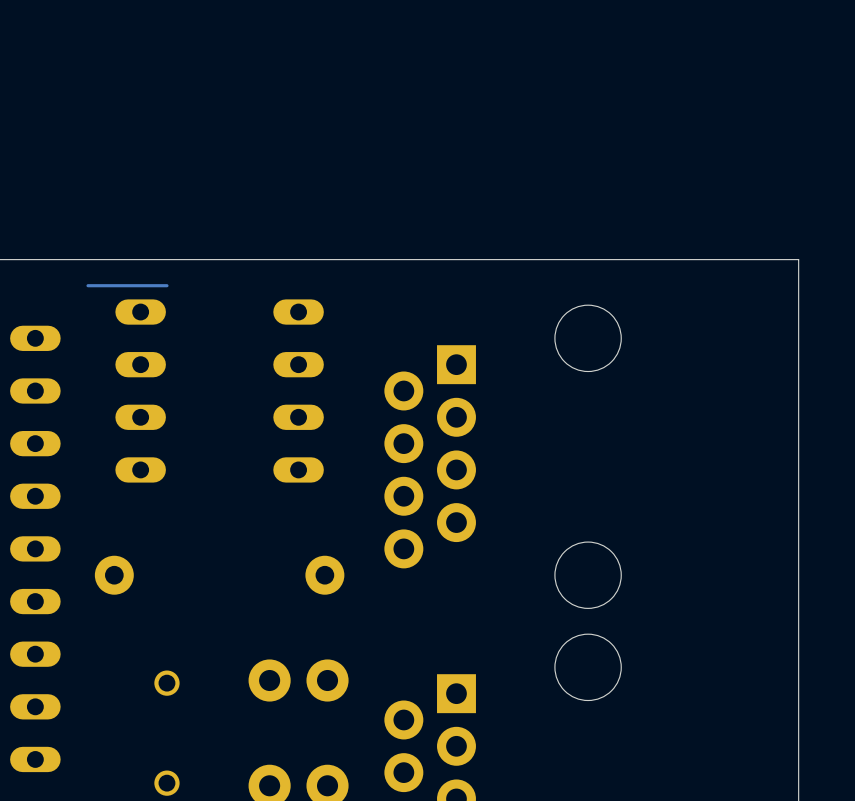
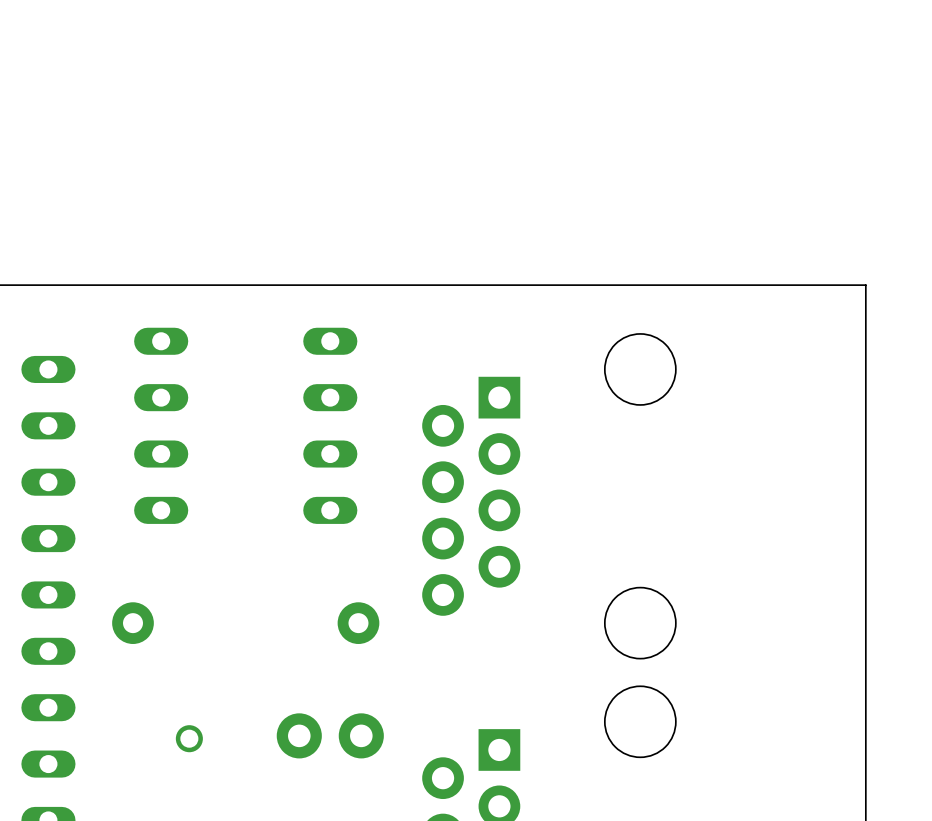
track: (166, 285) (88, 285) -> none

